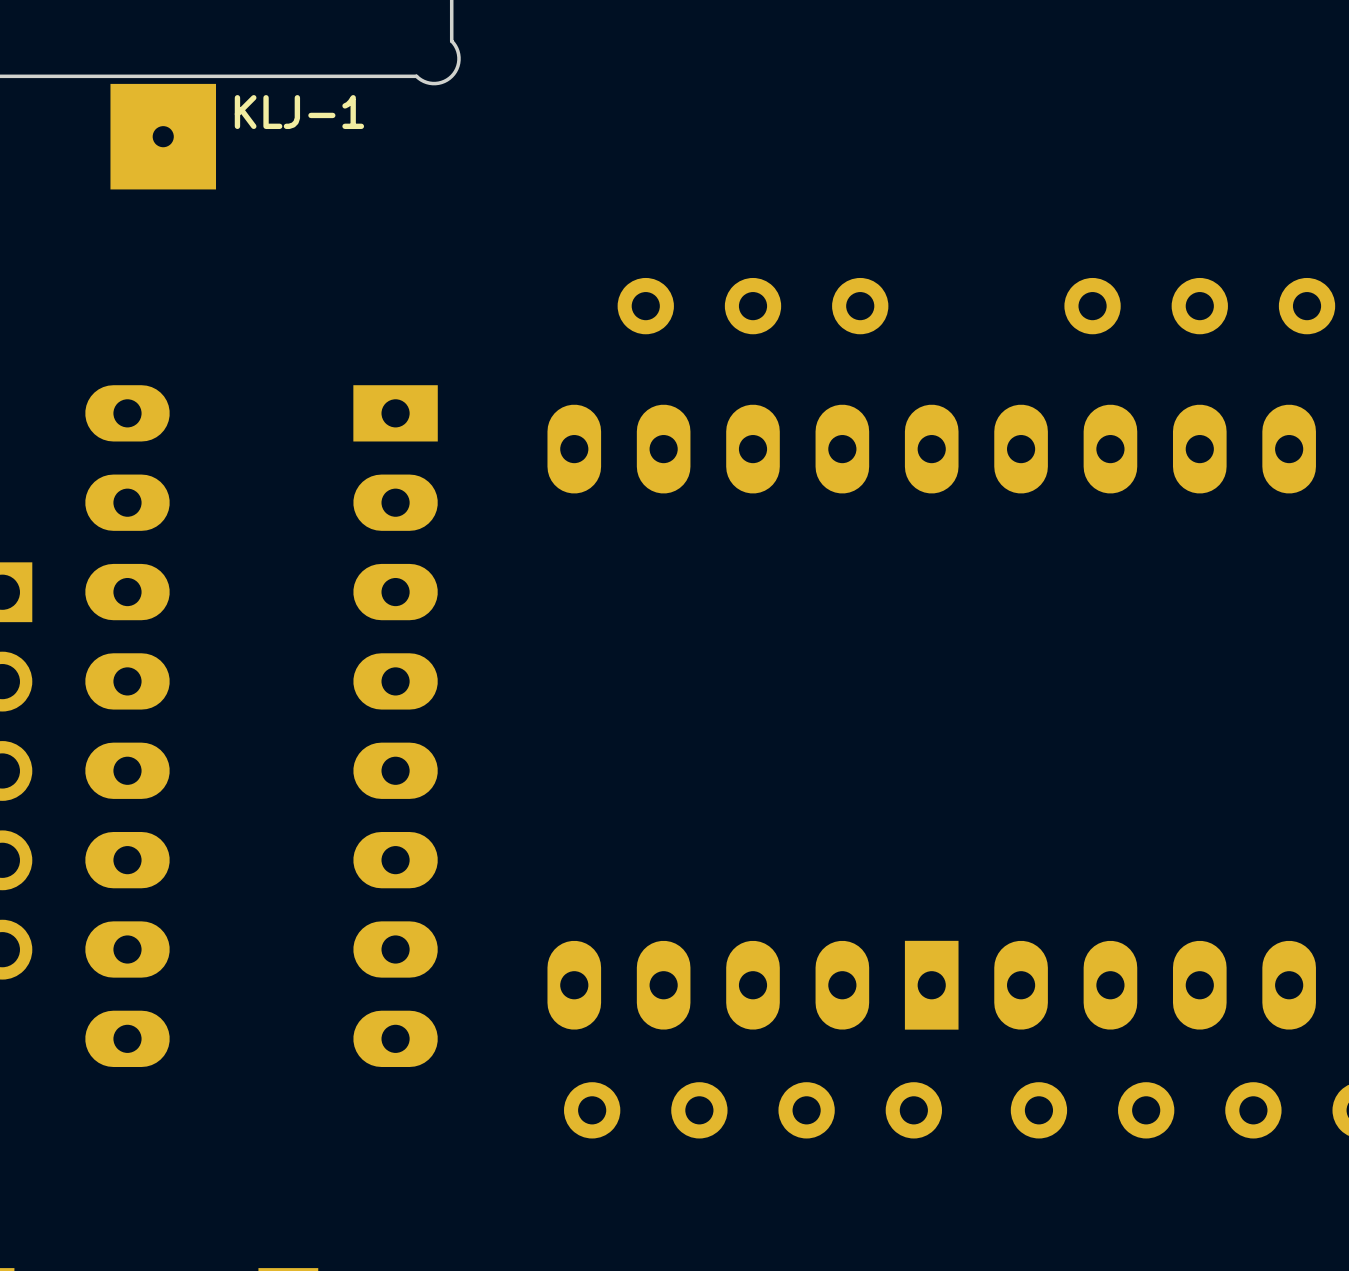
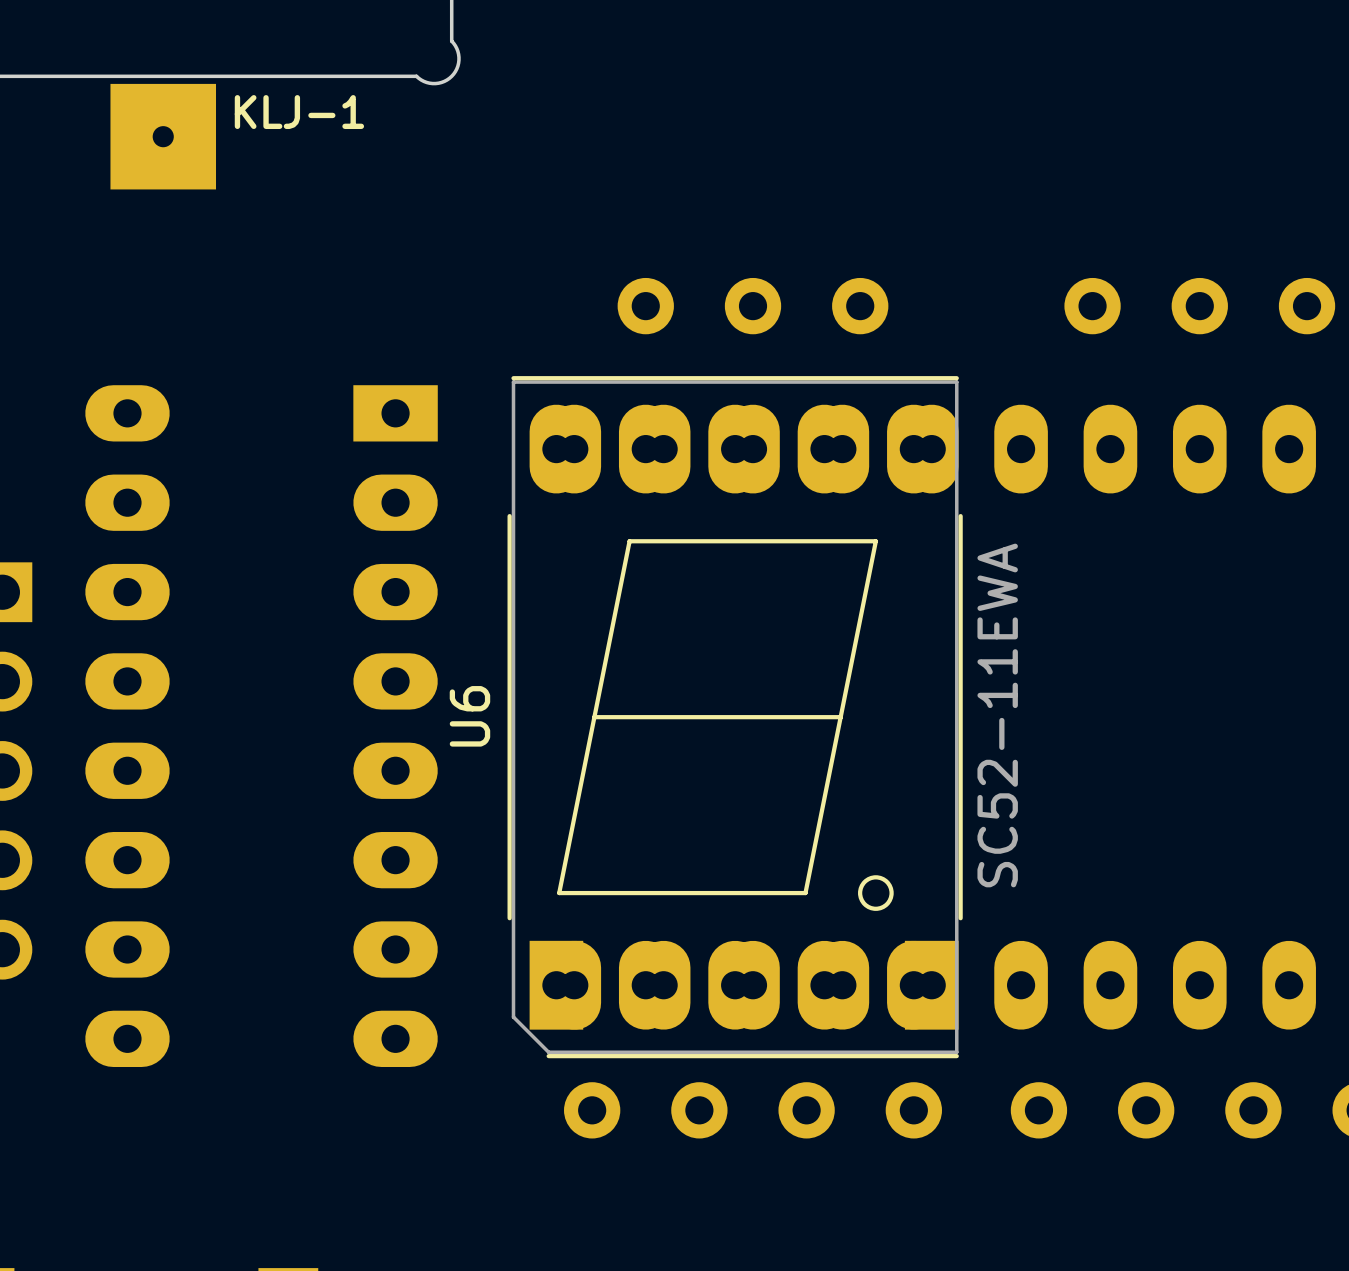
U6: none -> SC52-11EWA (735, 717)

